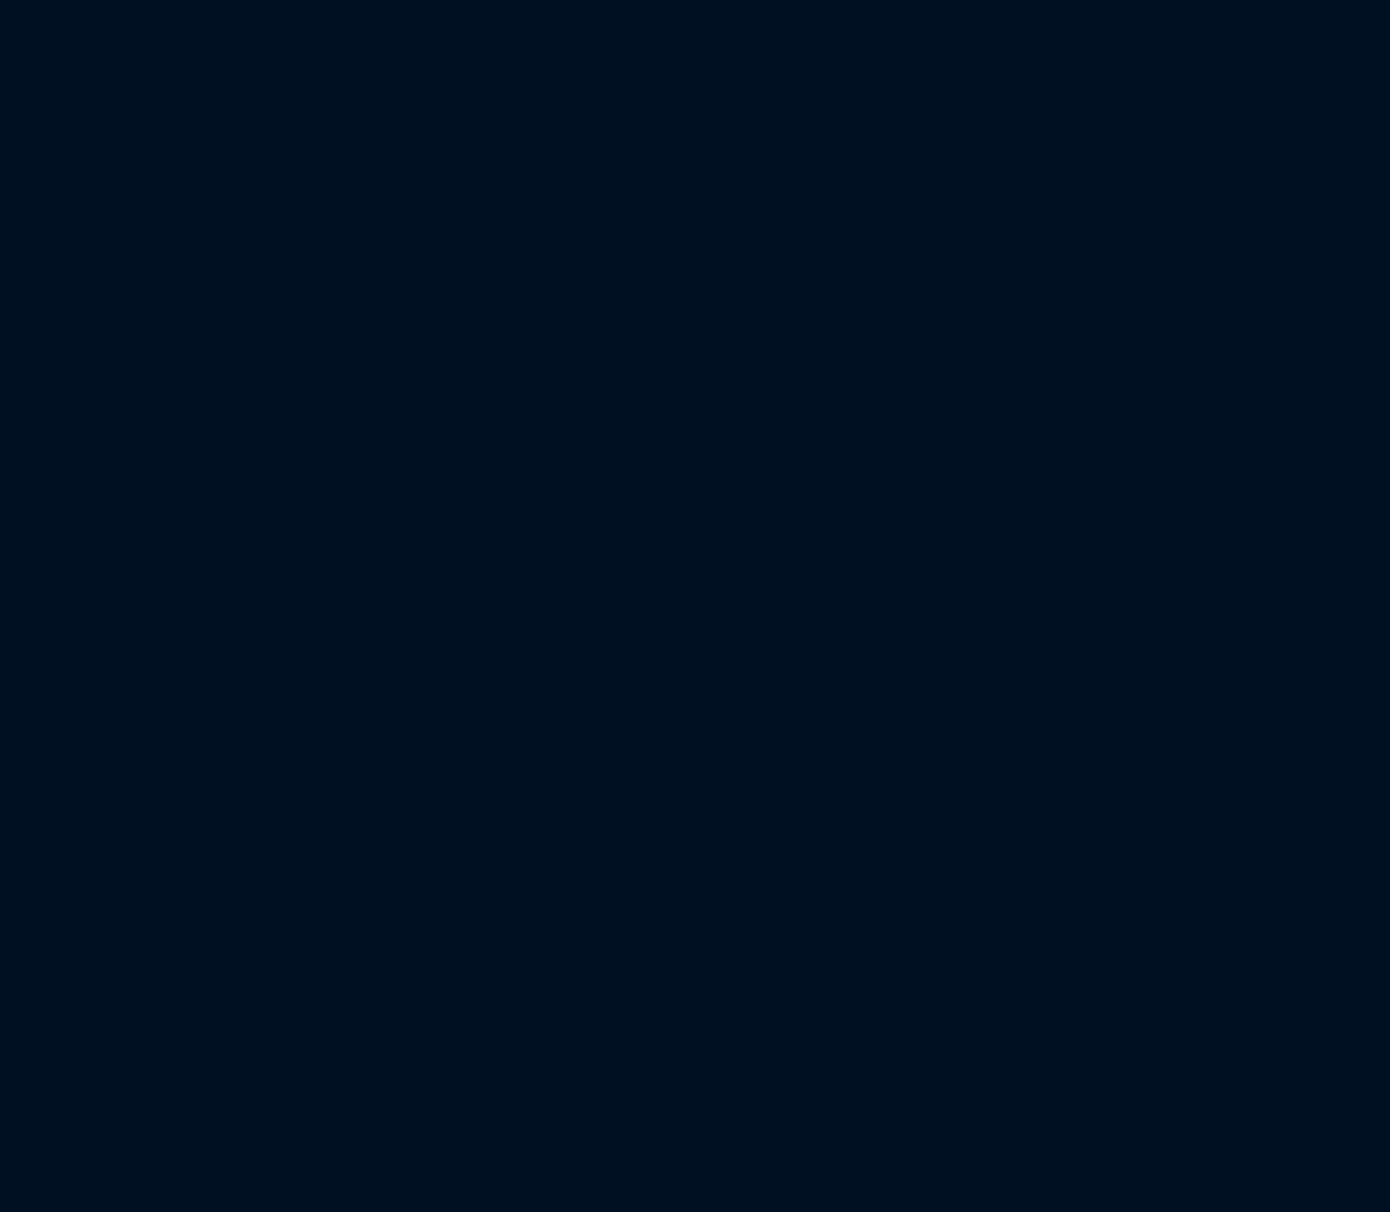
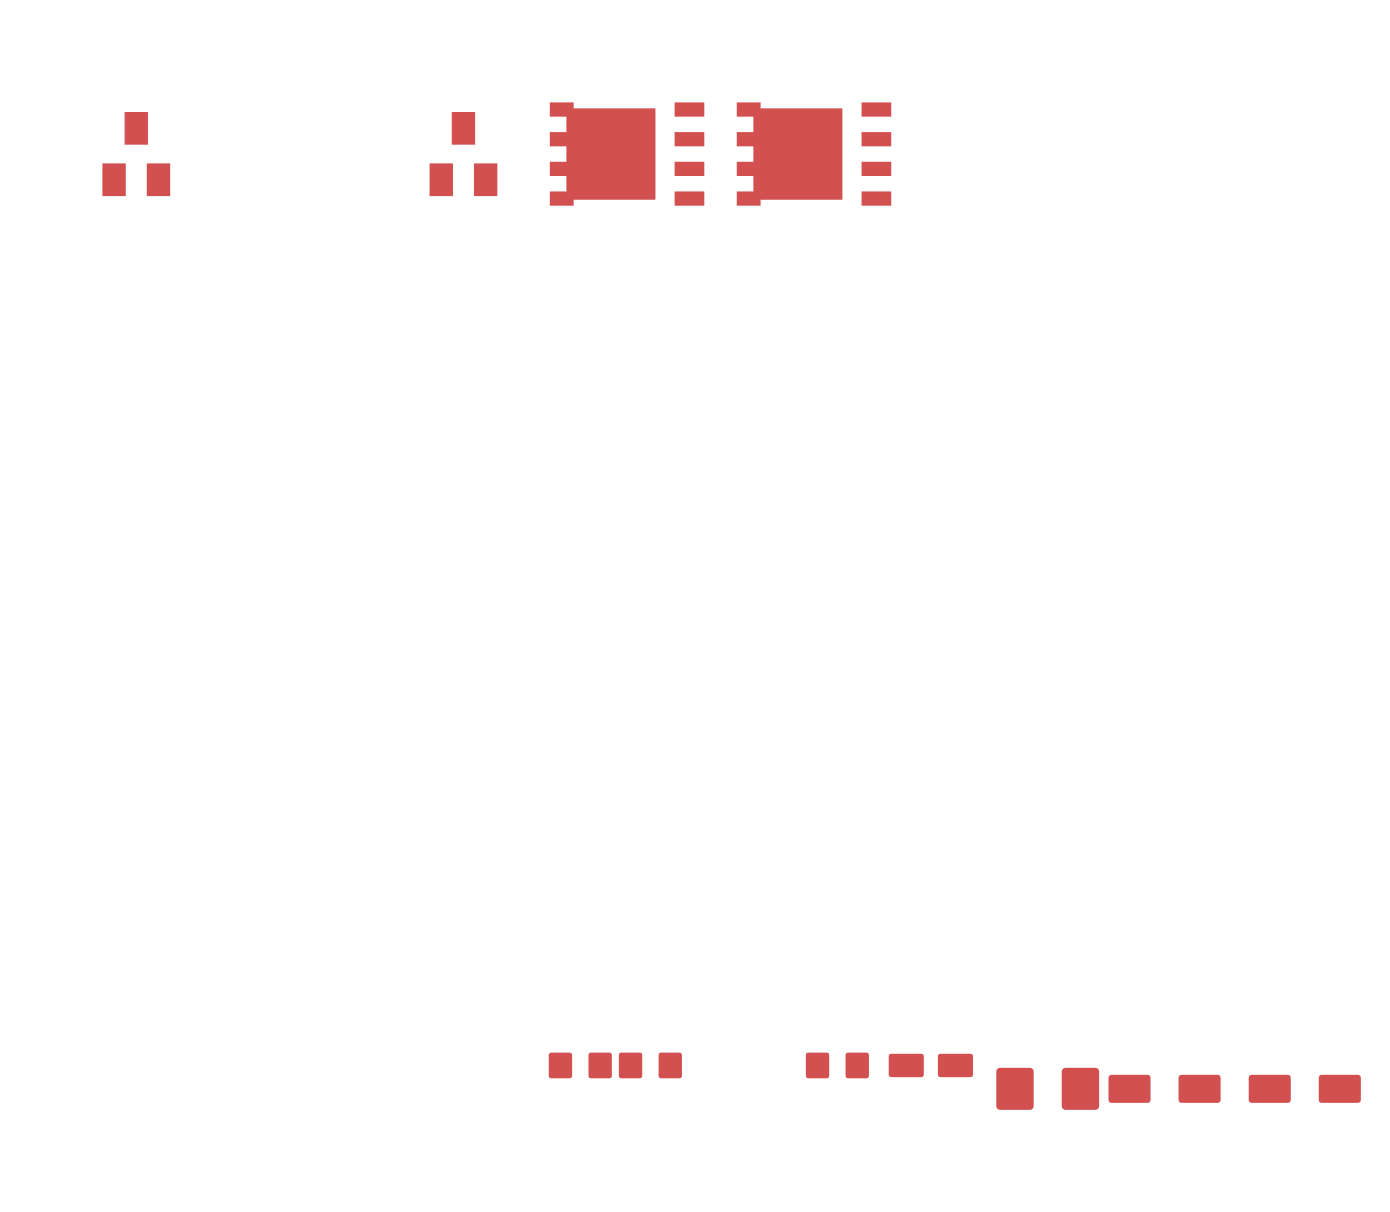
part: none -> (136, 154)
part: none -> (463, 154)
part: none -> (627, 154)
part: none -> (814, 154)
part: none -> (580, 1065)
part: none -> (650, 1065)
part: none -> (837, 1065)
part: none -> (930, 1065)
part: none -> (1047, 1088)
part: none -> (1164, 1088)
part: none -> (1304, 1088)

